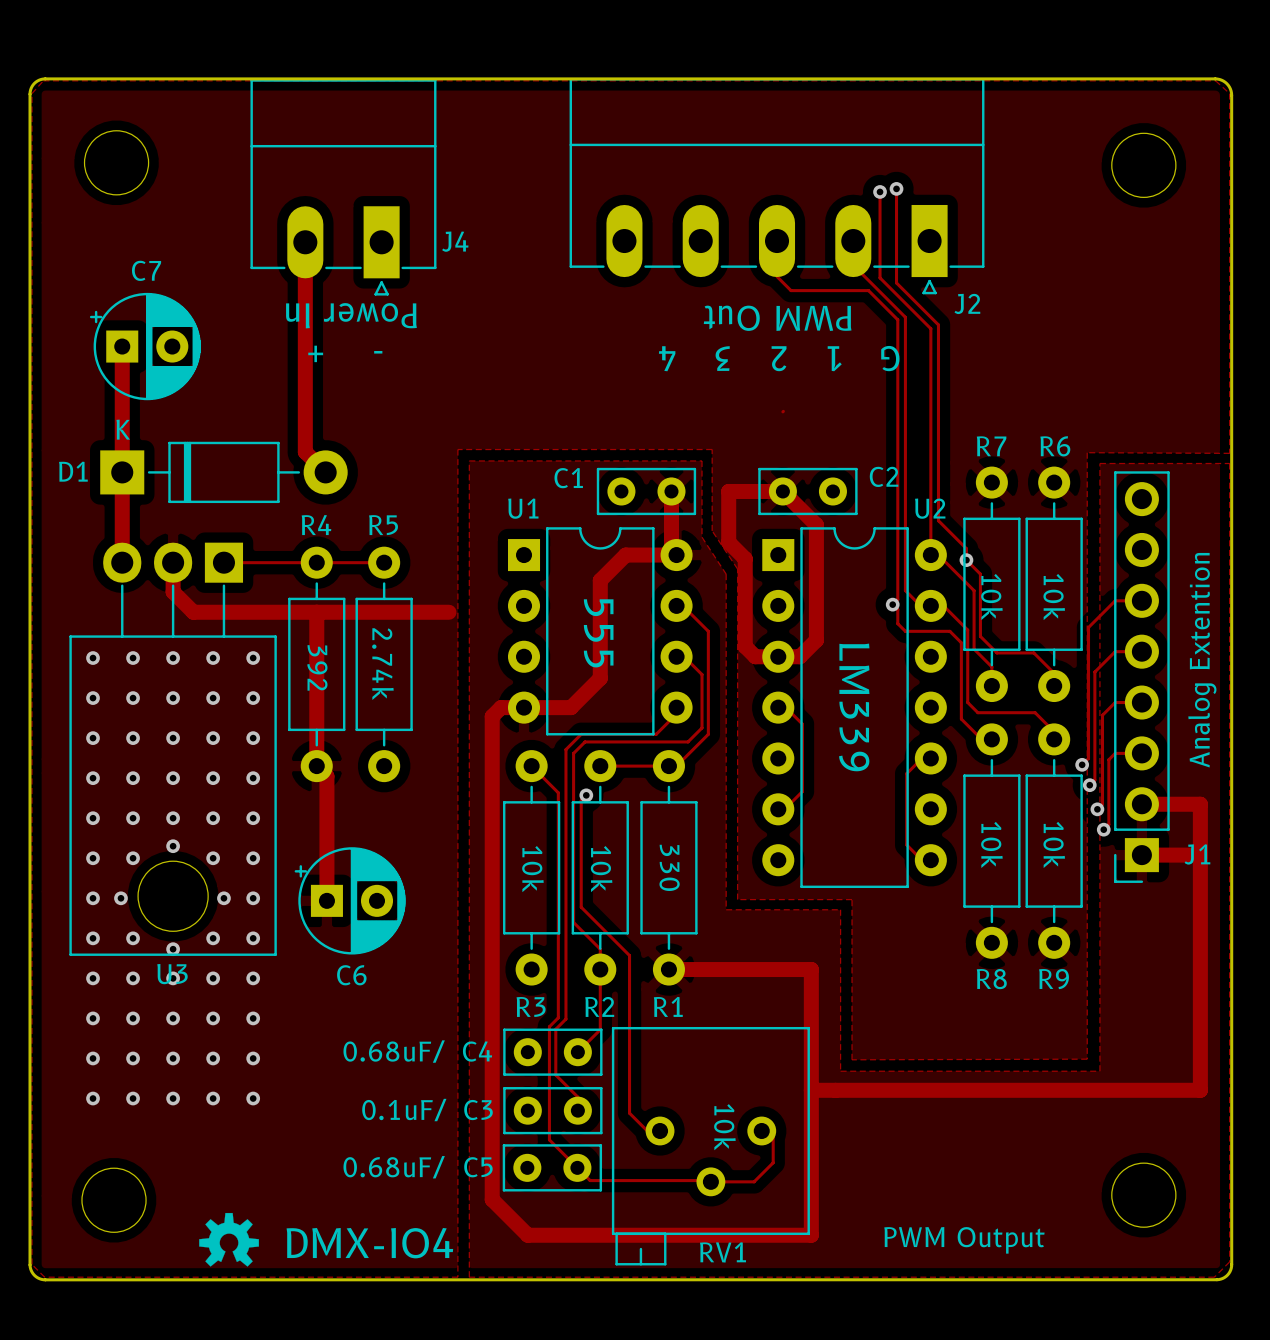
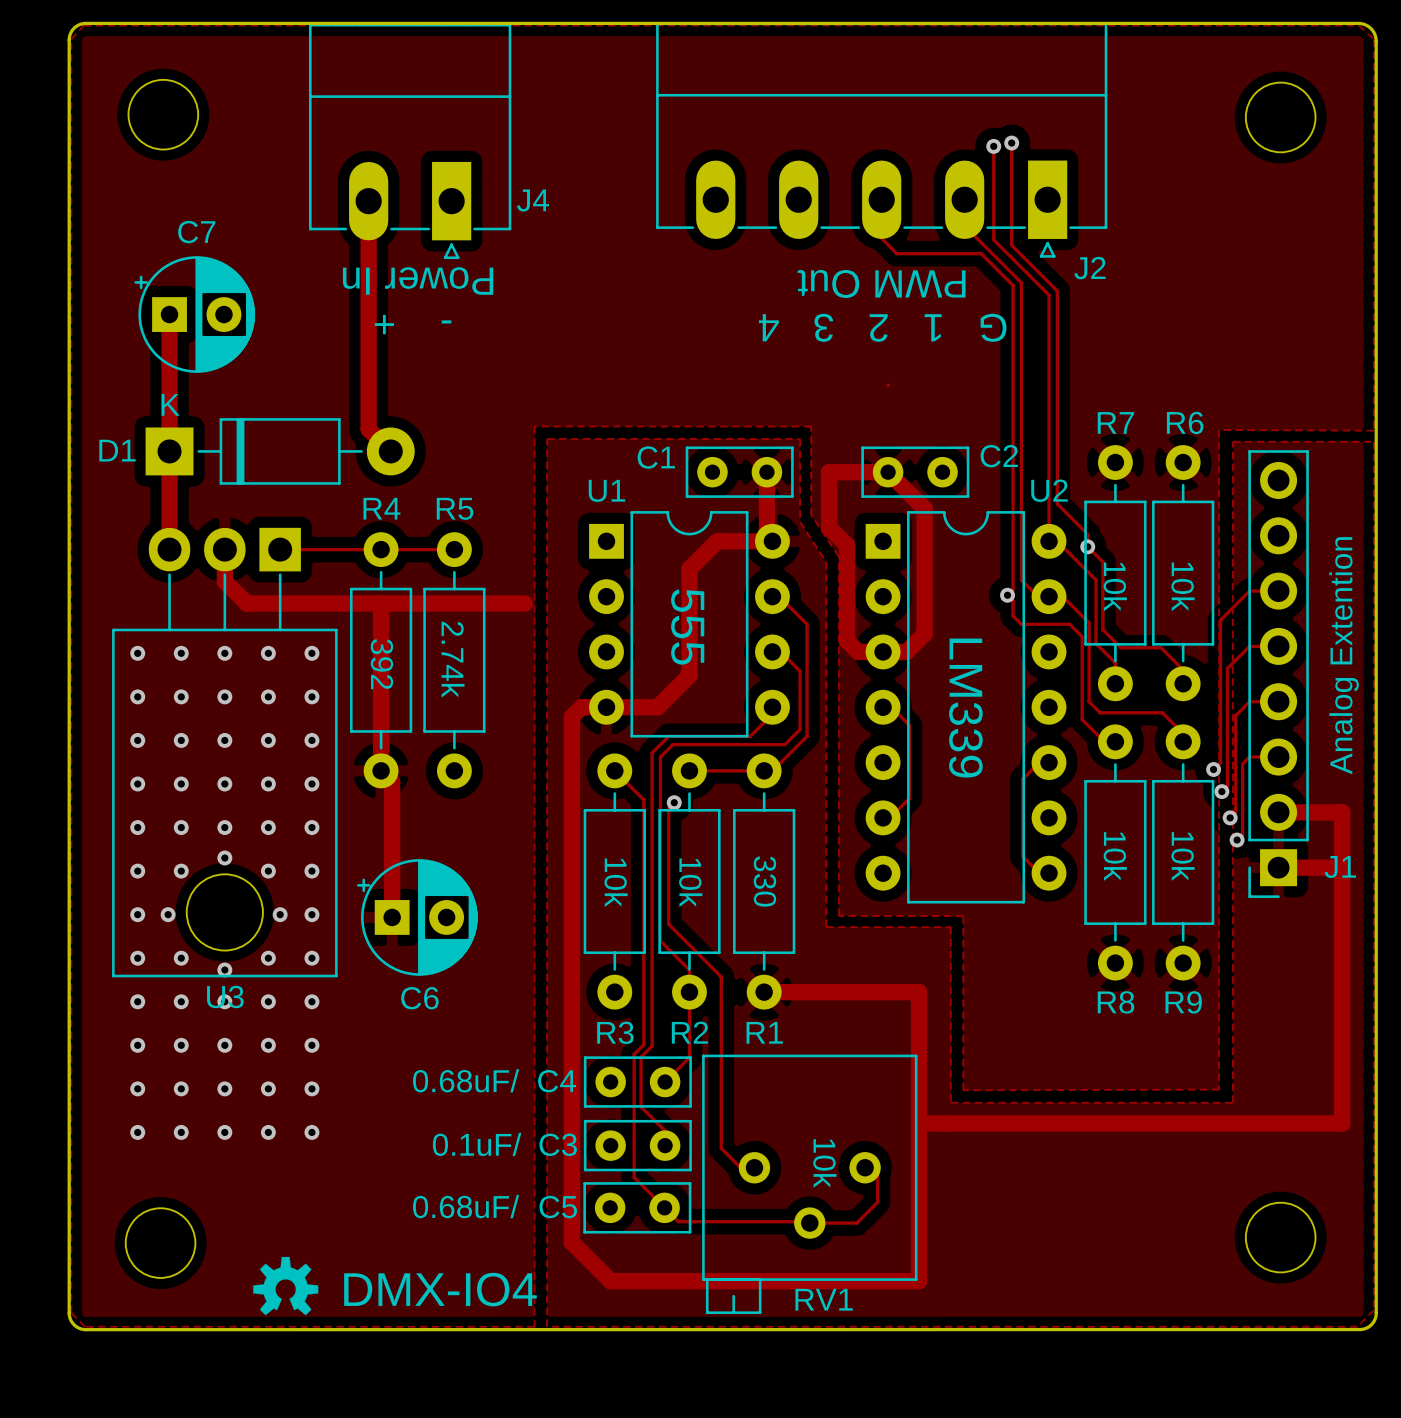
text: PWM Output (964, 1240) -> none

